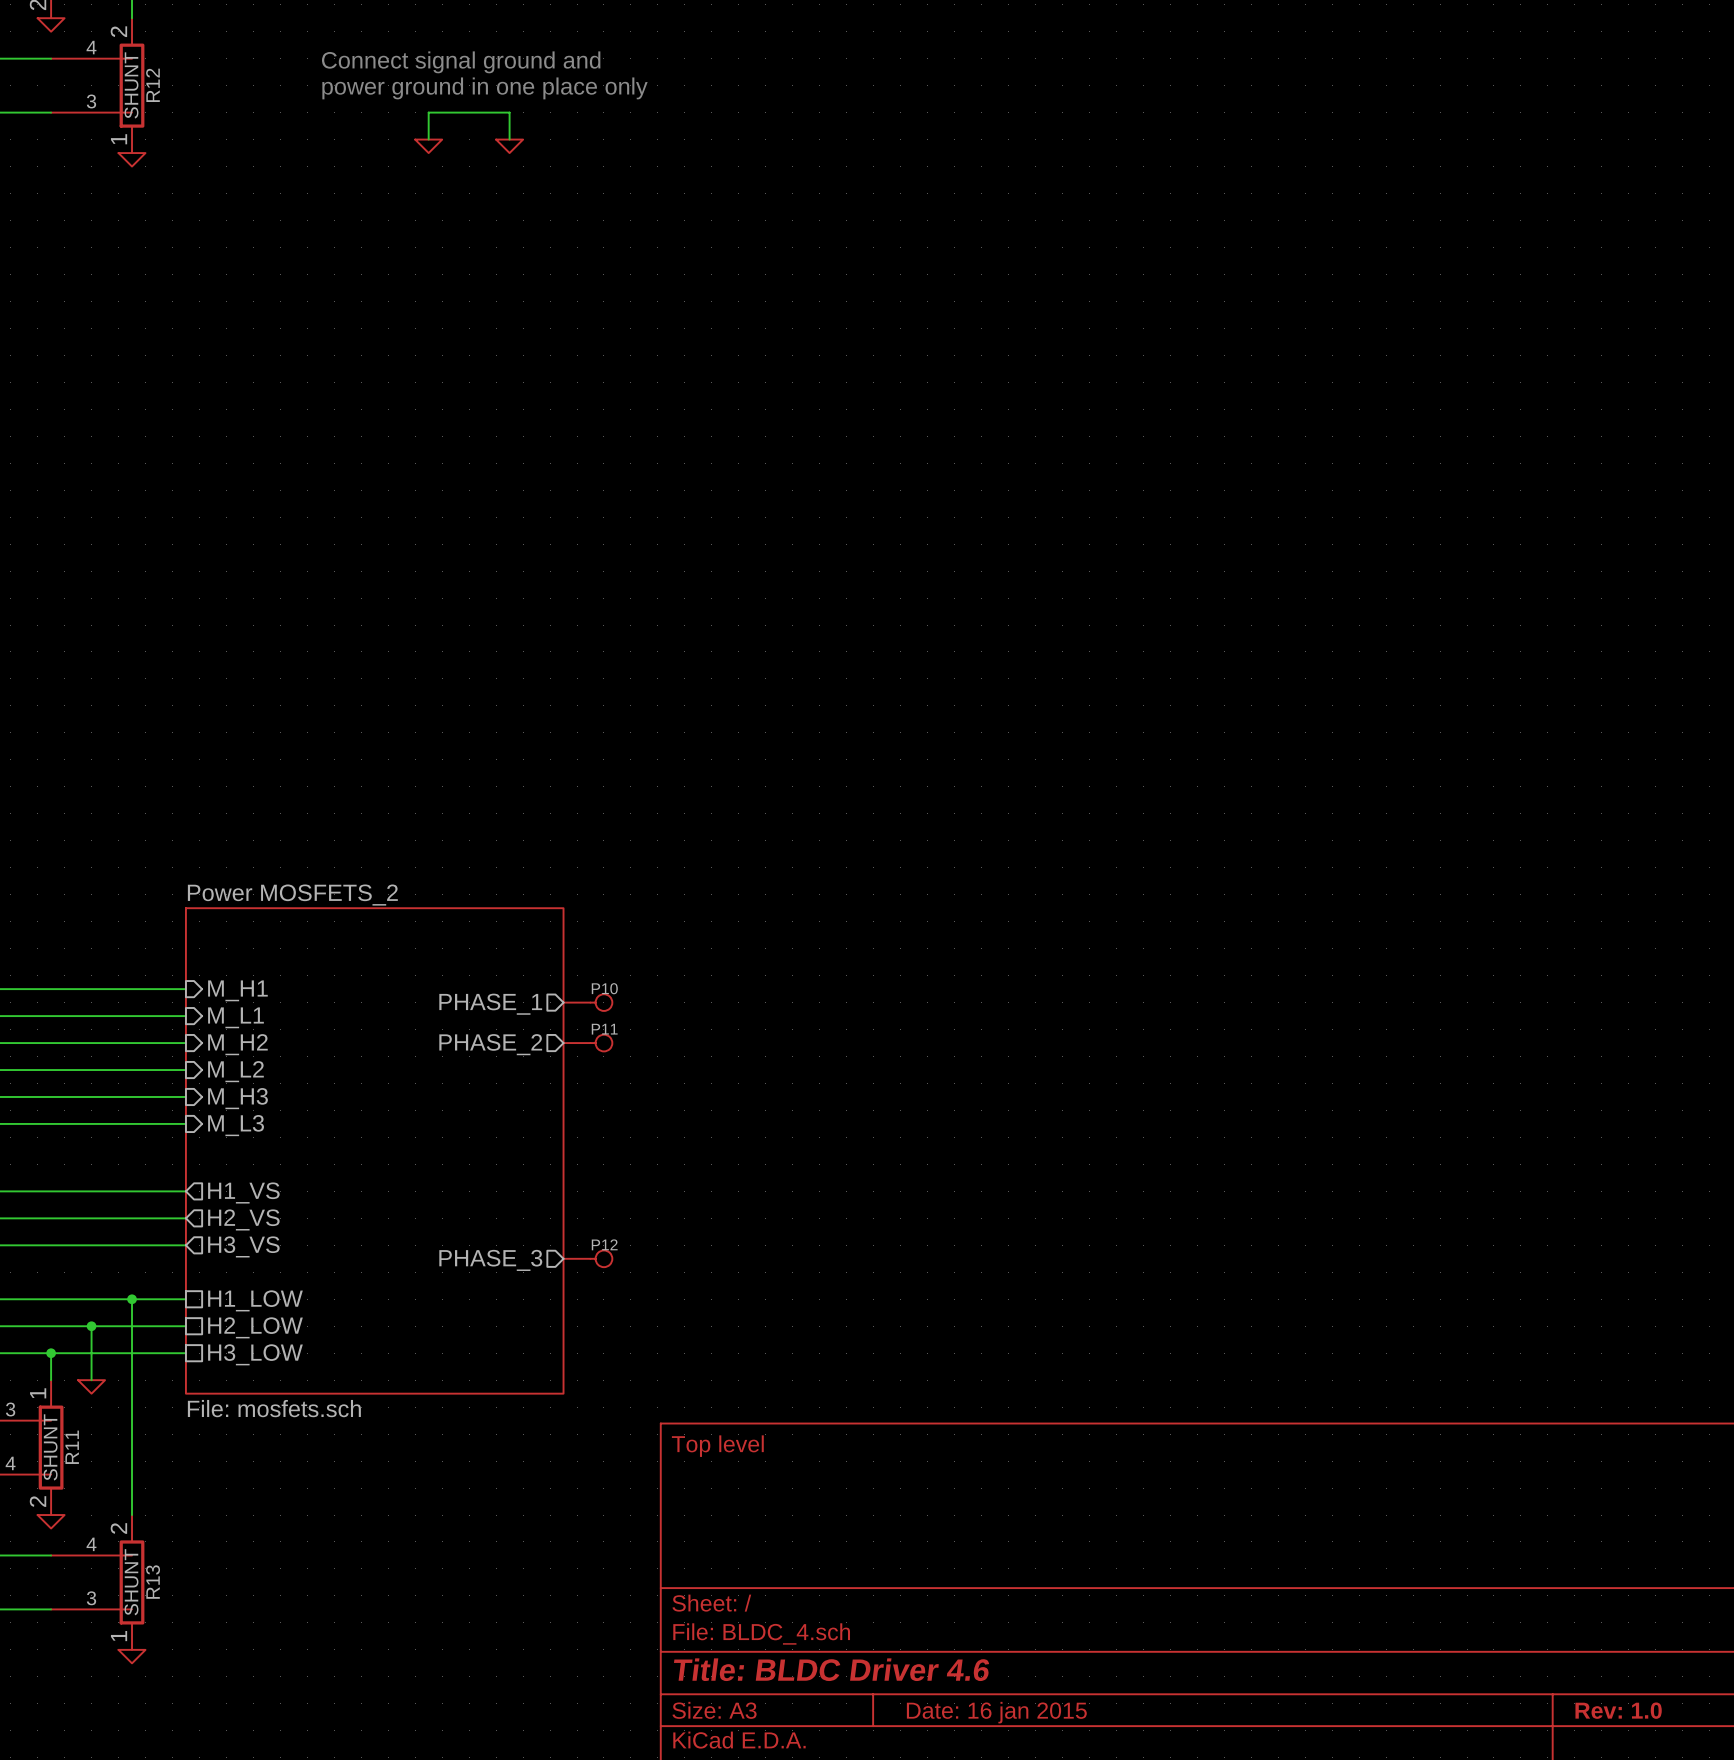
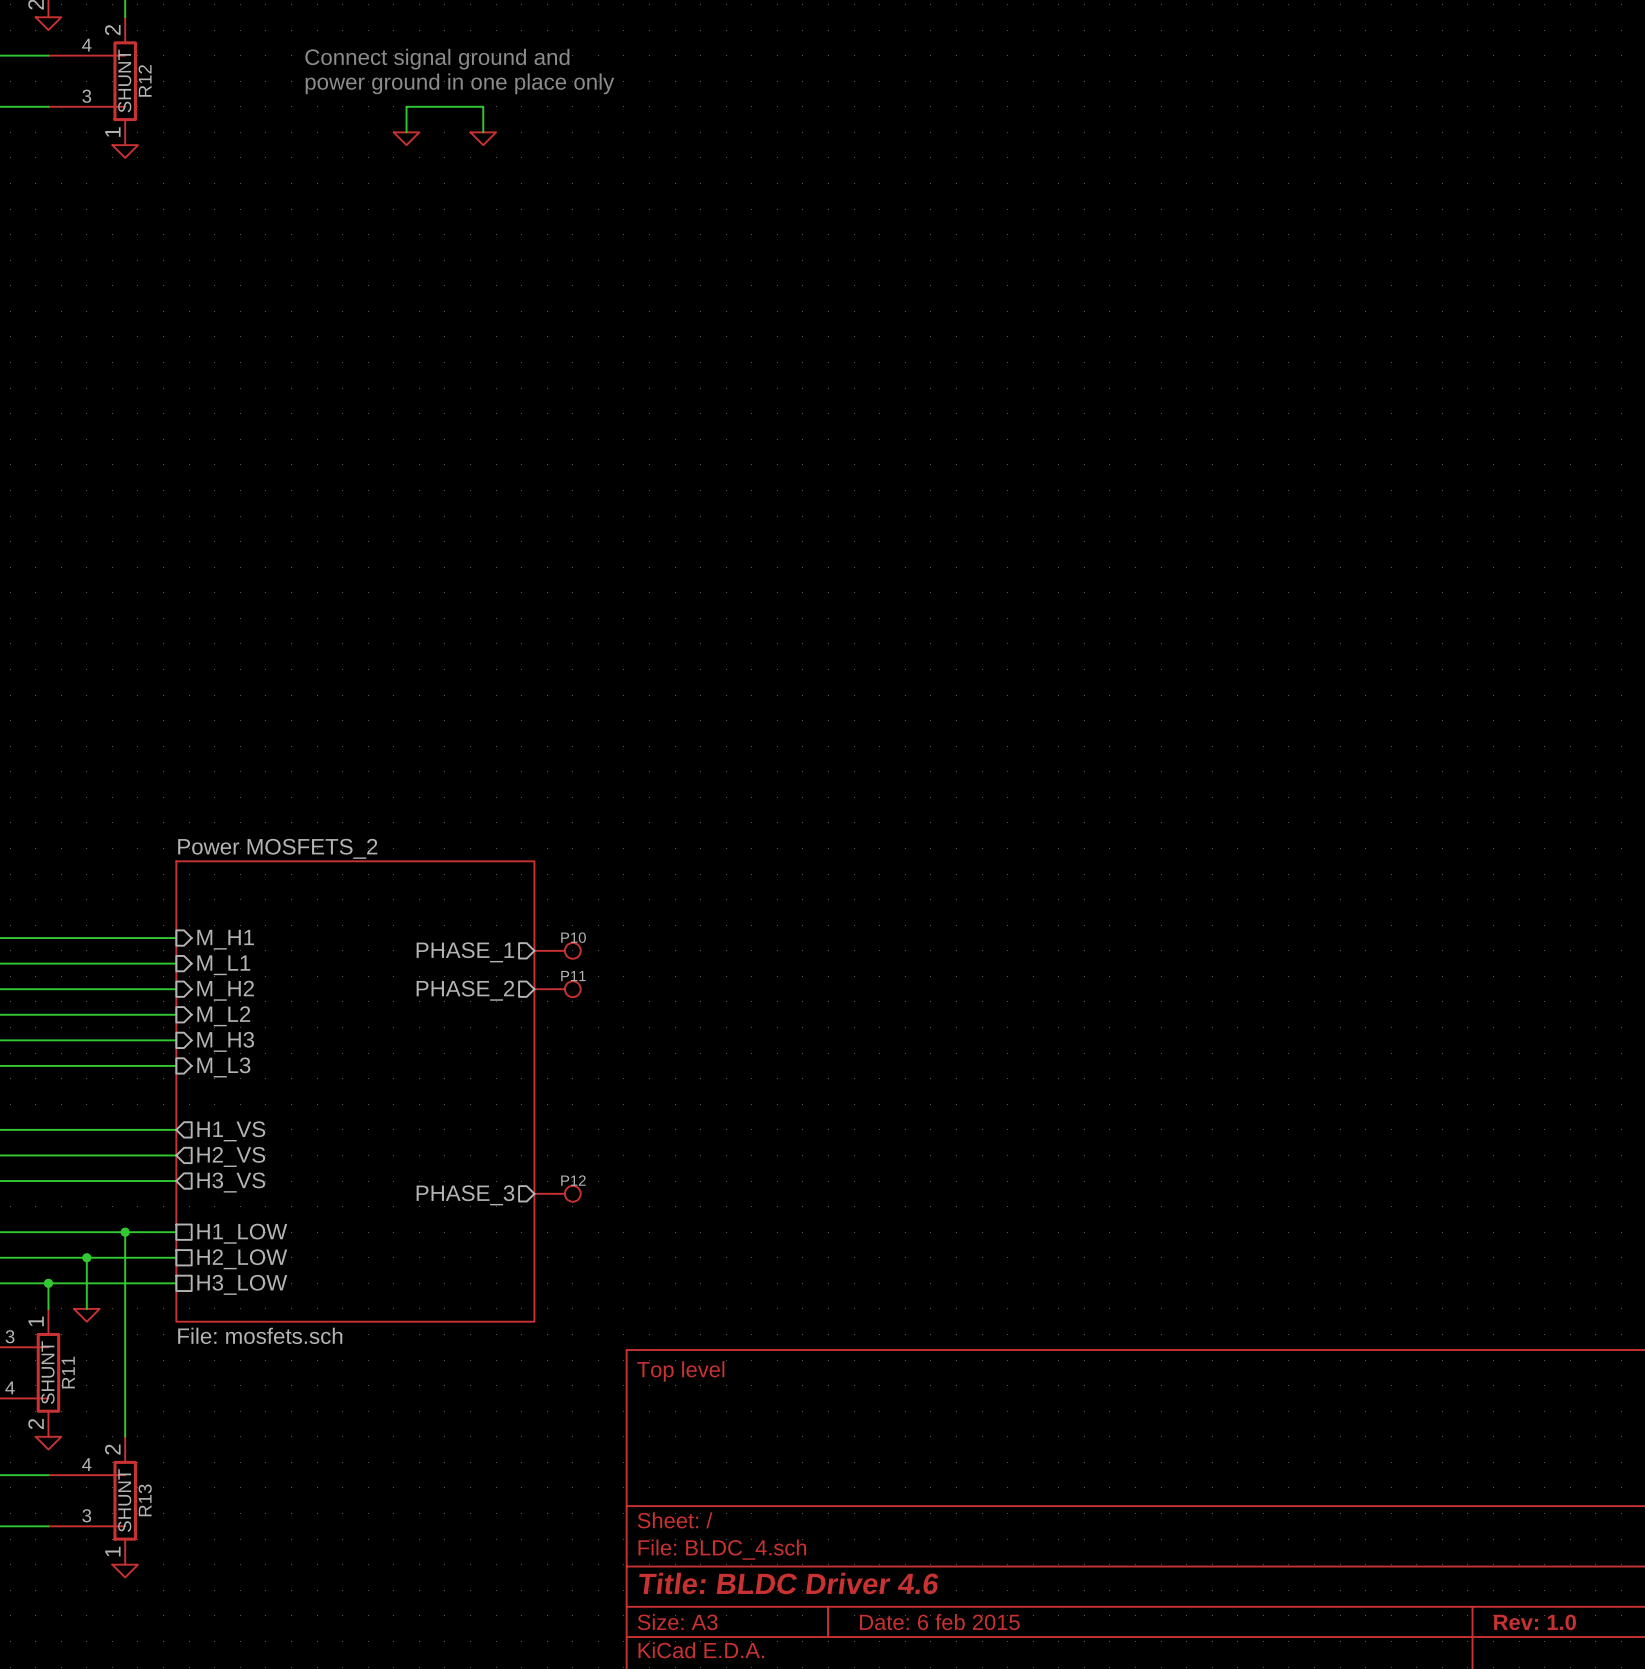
title block: Date: 16 jan 2015 (996, 1712) -> Date: 6 feb 2015 (939, 1622)

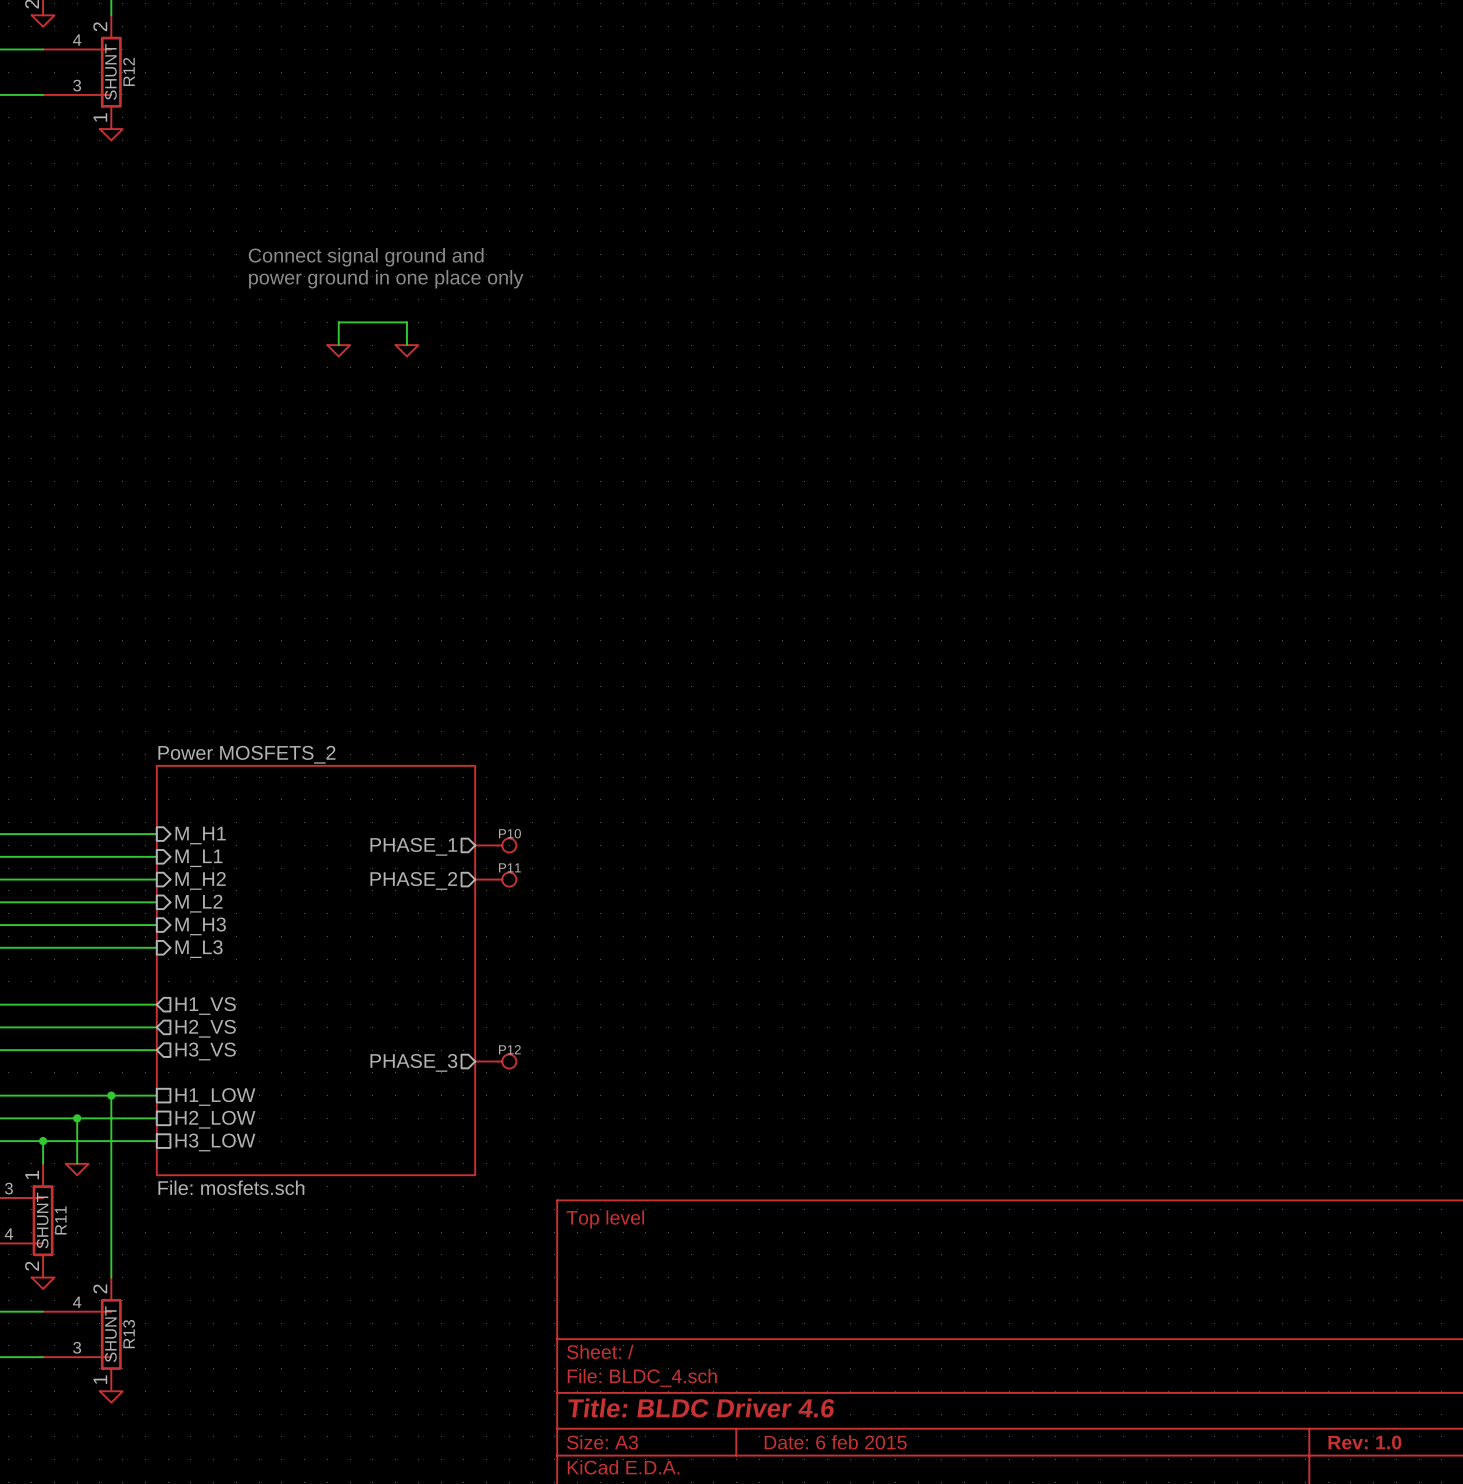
text position: Connect signal ground and (437, 59) -> Connect signal ground and (366, 257)
text position: power ground in one place only (459, 83) -> power ground in one place only (386, 279)
wire: (406, 132) (406, 106) (483, 106) (483, 132) -> none
power symbol: (406, 138) -> none
power symbol: (483, 138) -> none
wire: none -> (338, 345) (338, 322) (406, 322) (406, 345)
power symbol: none -> (338, 350)
power symbol: none -> (406, 350)

